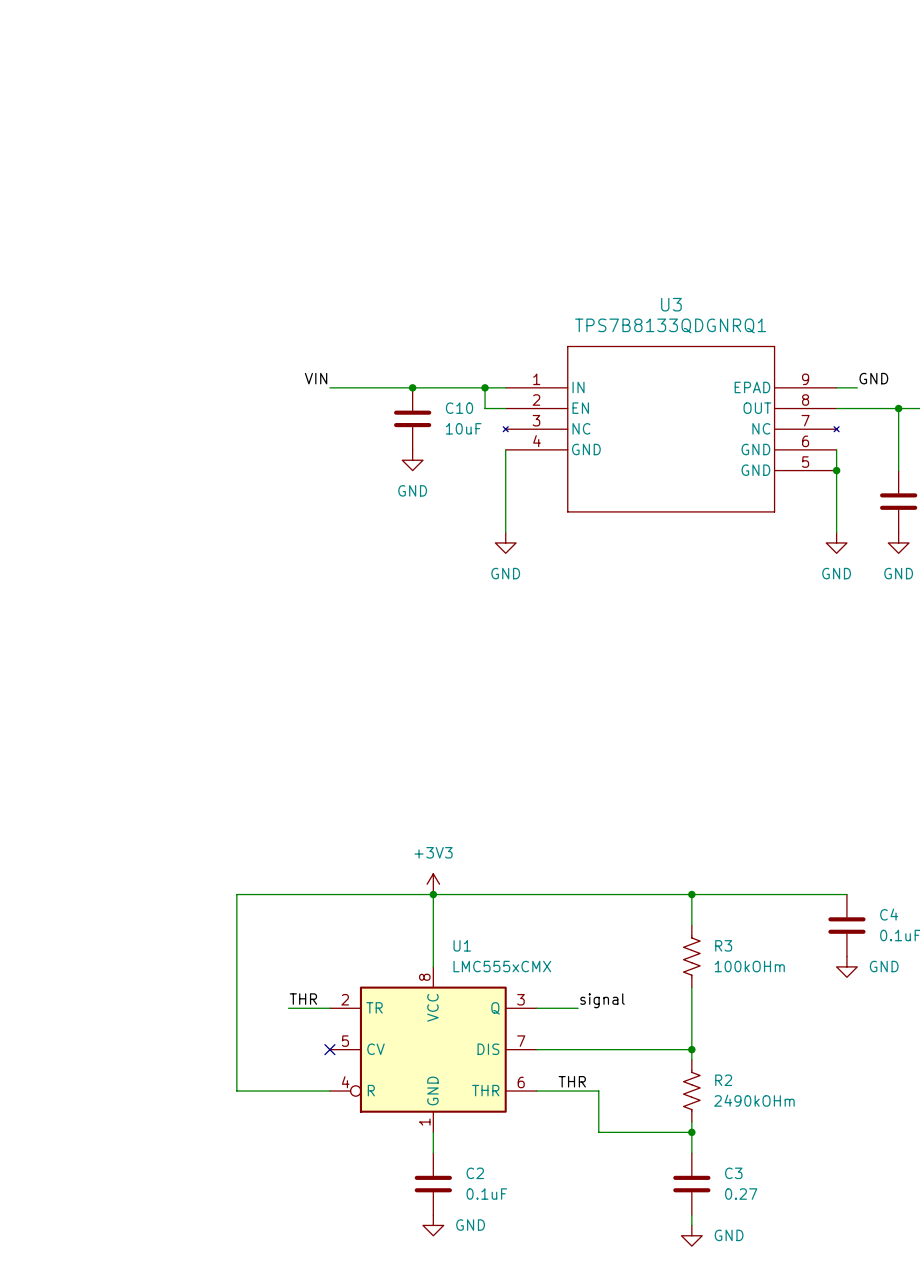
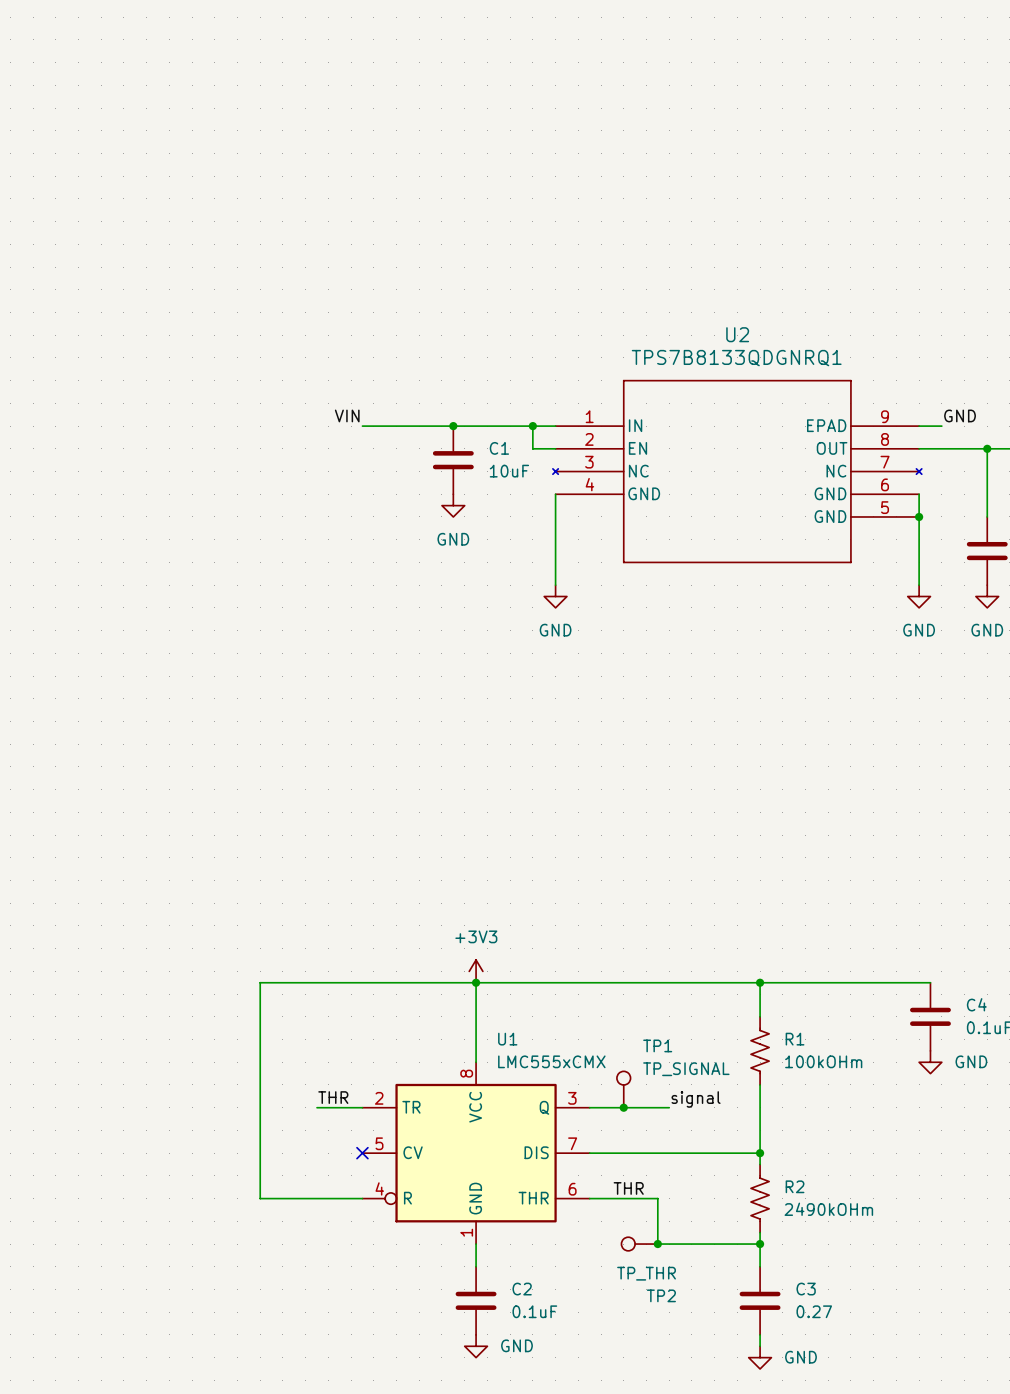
U3 name: U3 (671, 304) -> U2 (737, 334)
C10 name: C10 (459, 408) -> C1 (499, 448)
R3 name: R3 (723, 945) -> R1 (795, 1039)
TP1: none -> TP_SIGNAL (623, 1089)
label position: signal (602, 1000) -> signal (696, 1099)
junction: none -> (623, 1107)
wire: none -> (635, 1107) (669, 1107)
TP2: none -> TP_THR (639, 1244)
junction: none -> (657, 1244)

